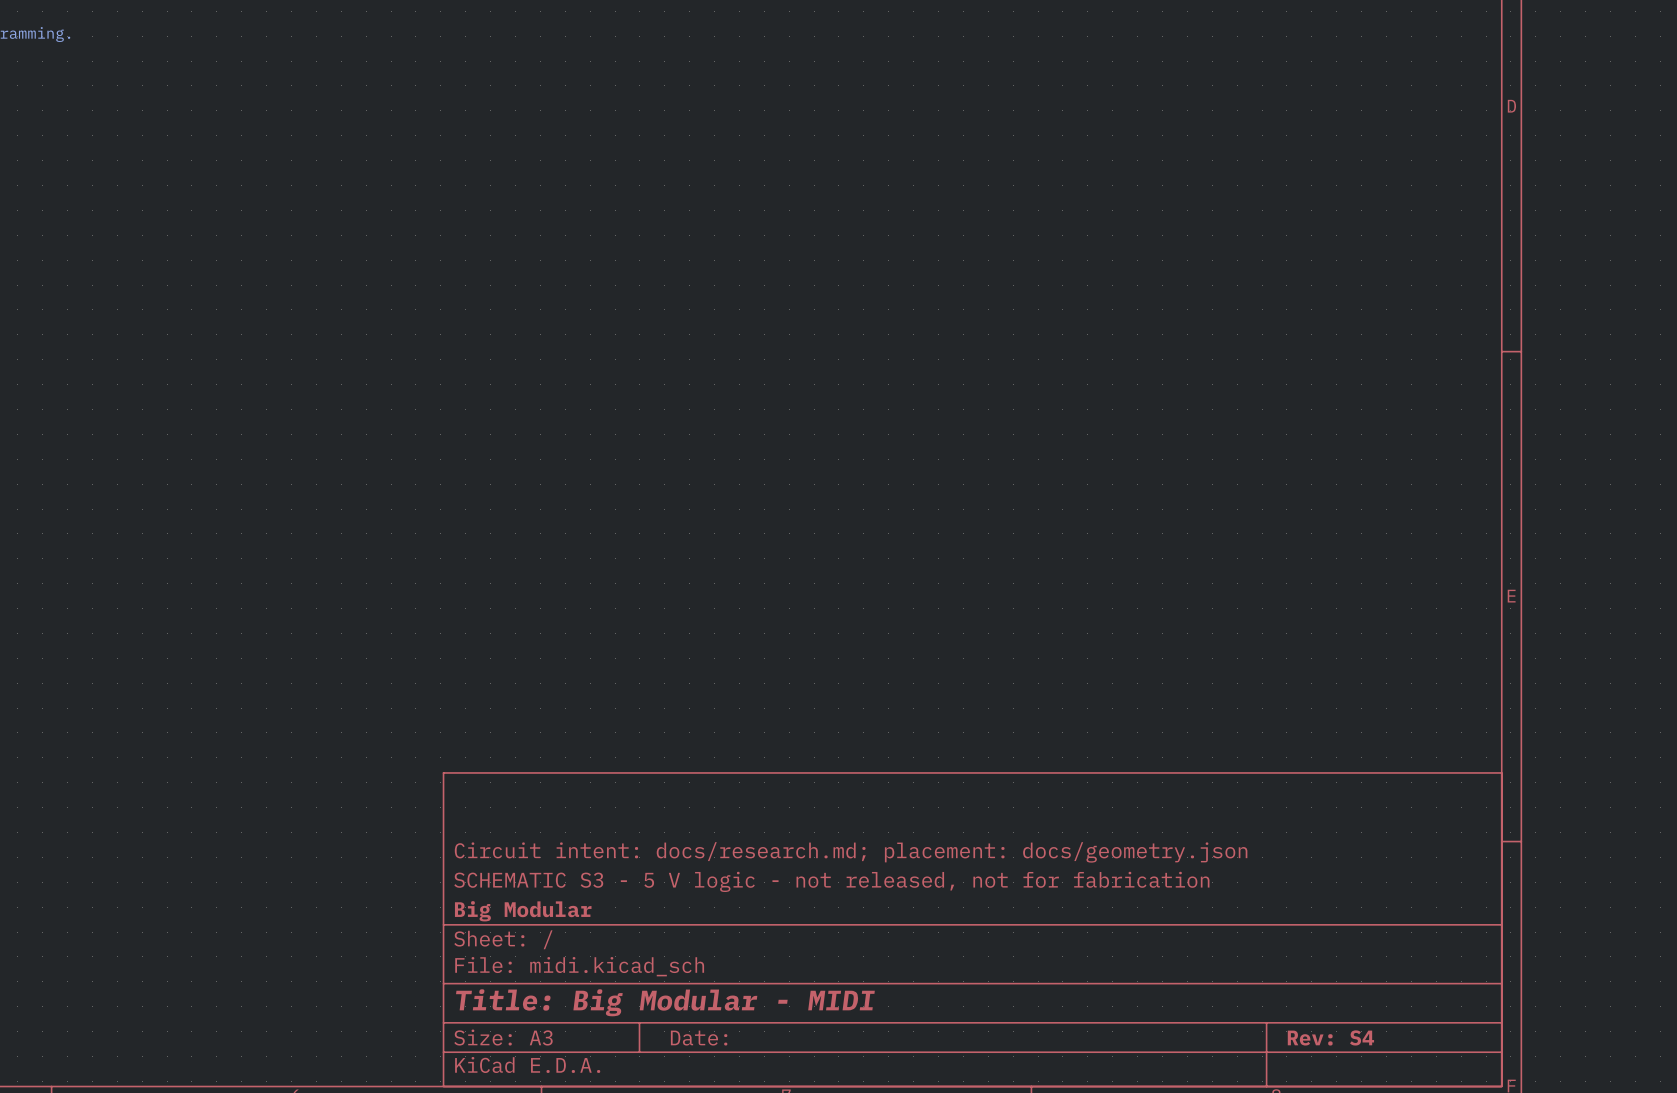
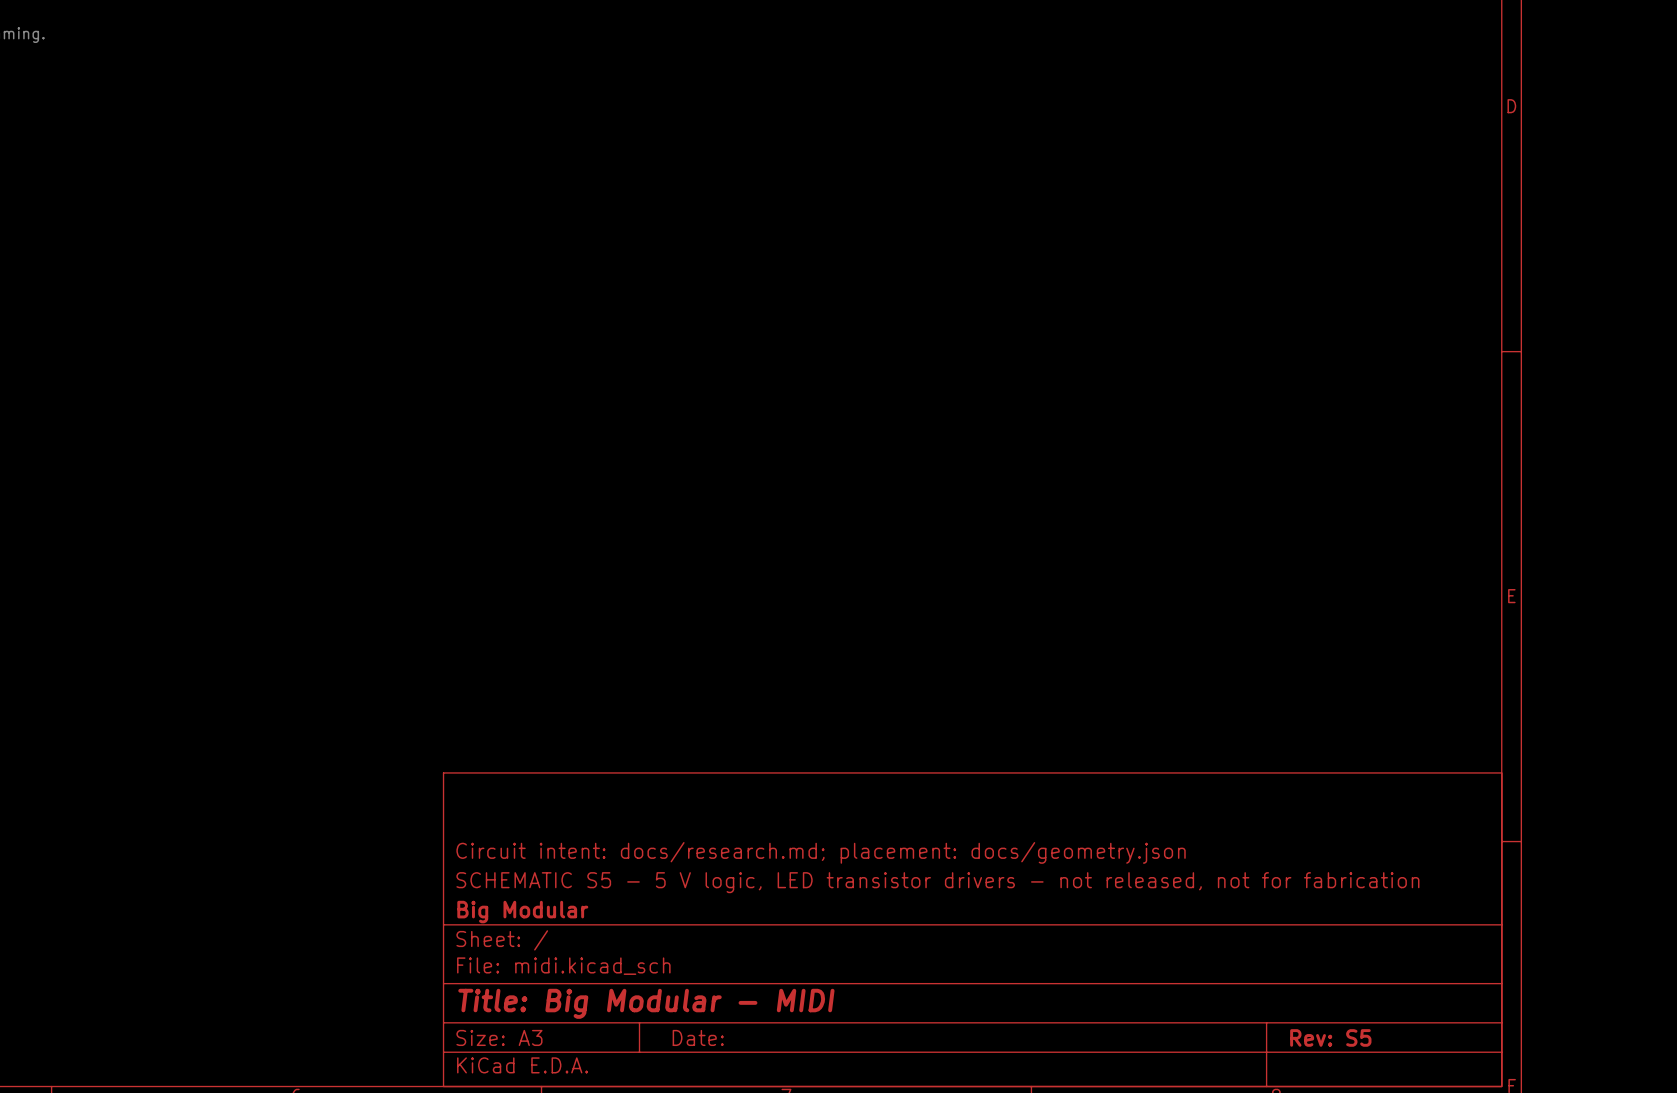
title block: SCHEMATIC S3 - 5 V logic - not released, not for fabrication (831, 881) -> SCHEMATIC S5 - 5 V logic, LED transistor drivers - not released, not for fabrication (937, 882)
title block: Rev: S4 (1330, 1037) -> Rev: S5 (1330, 1037)

